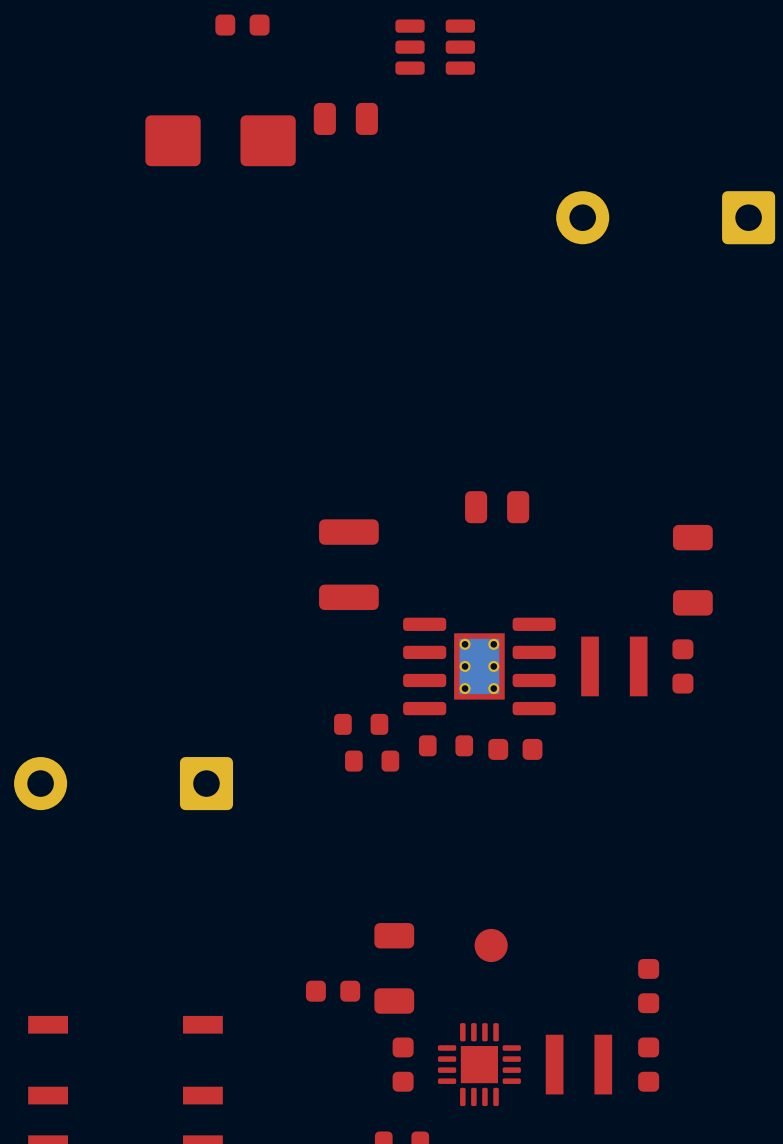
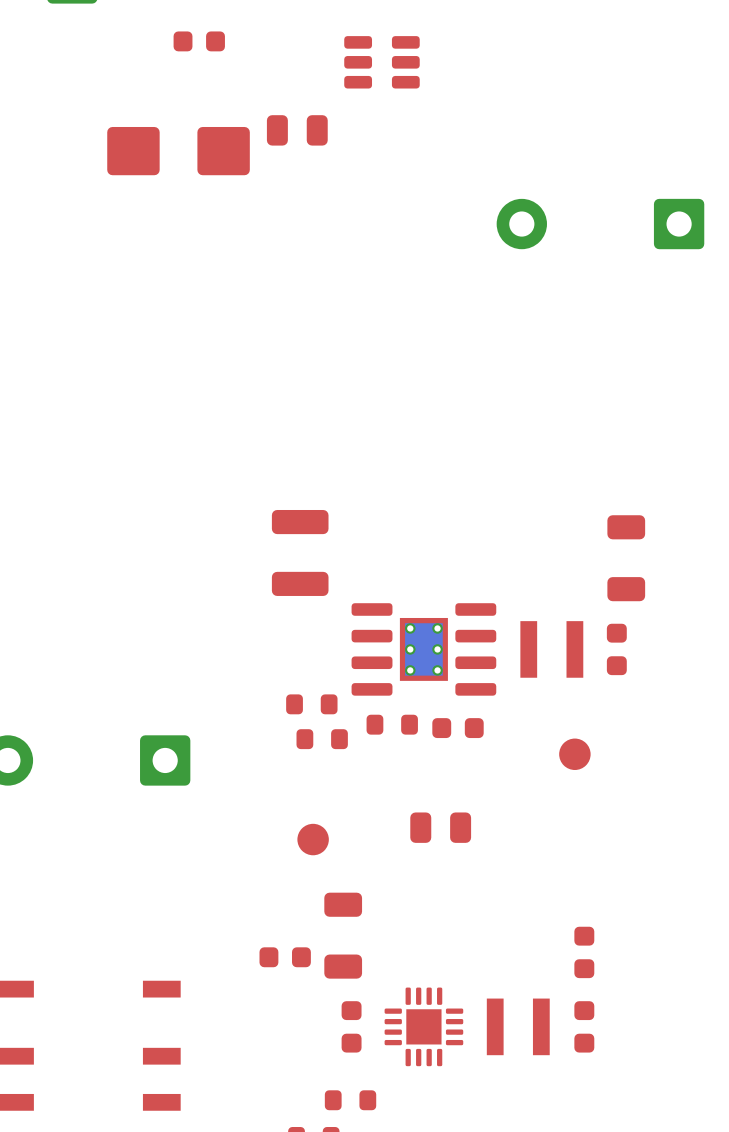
part position: (497, 507) -> (440, 827)
part: none -> (574, 754)
part: none -> (313, 839)
part: (491, 945) -> none

